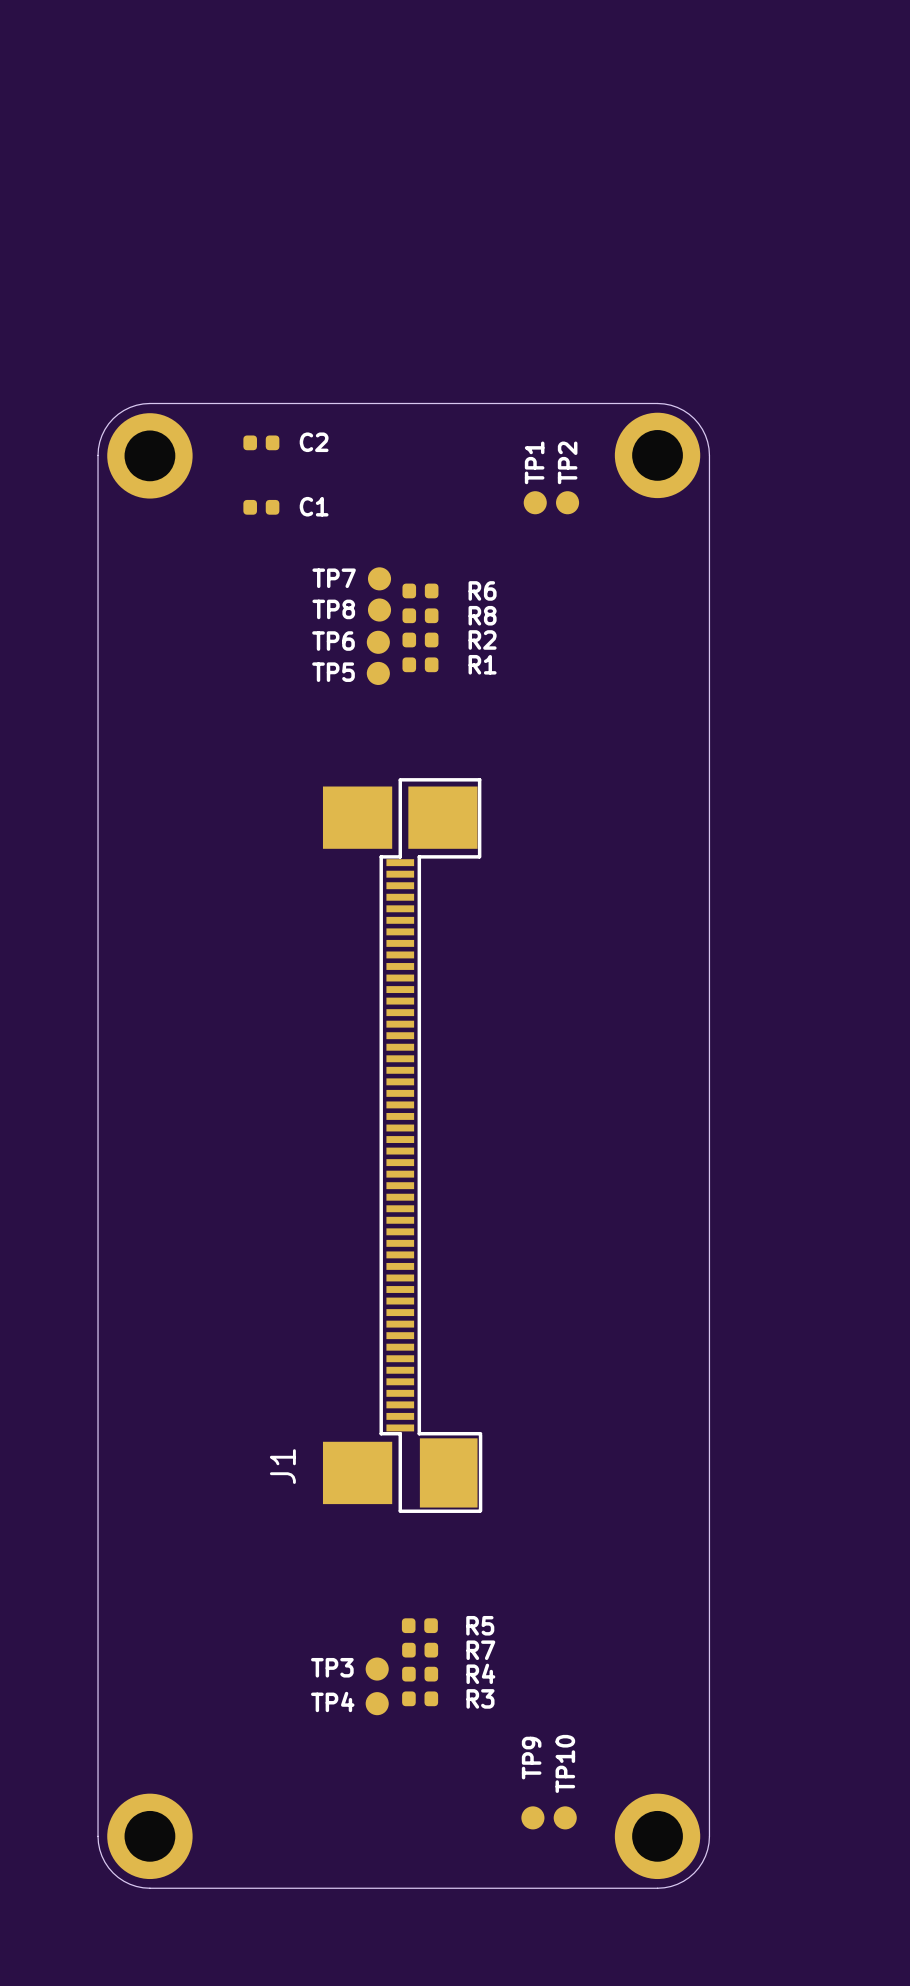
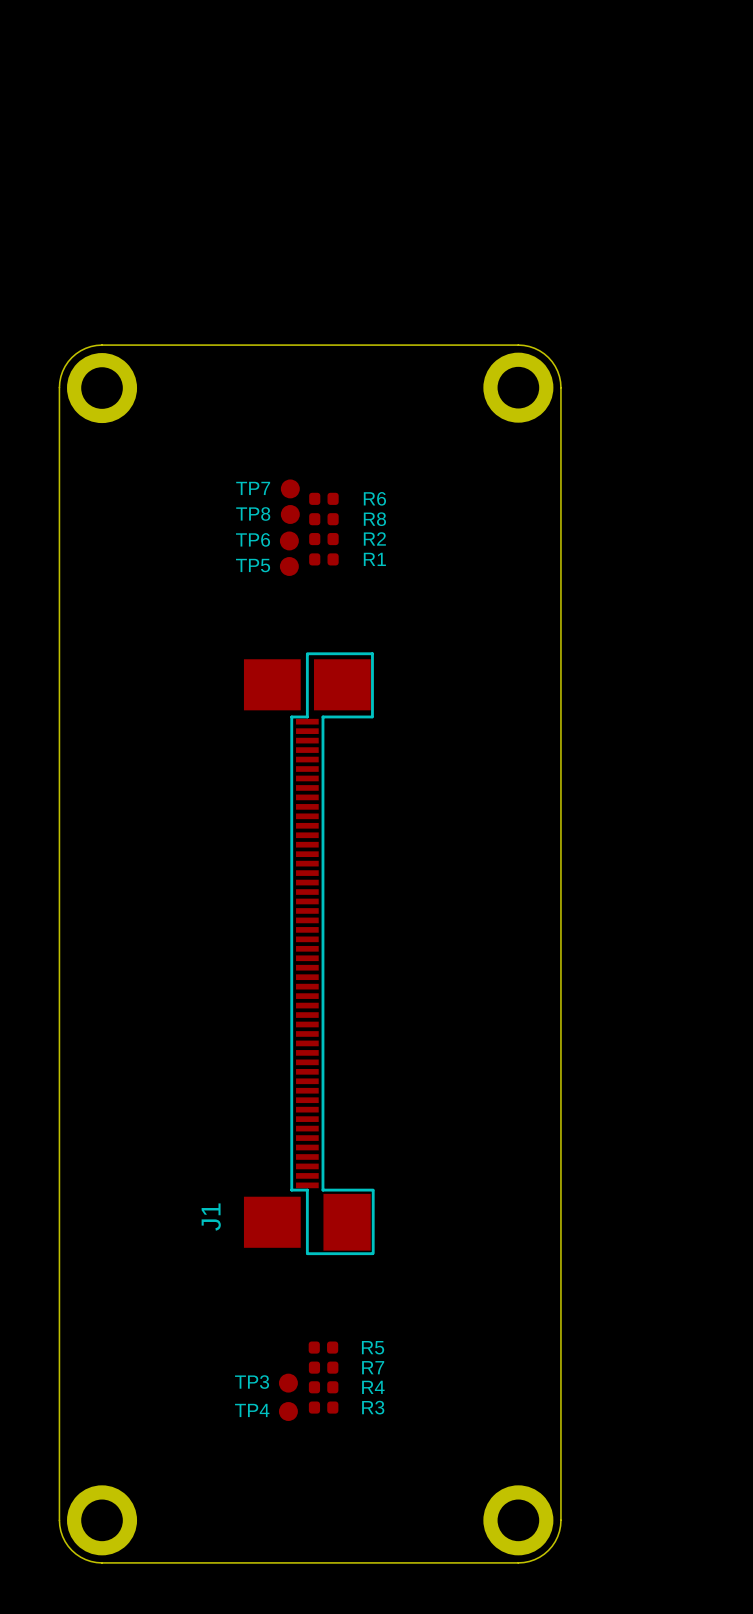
C2: (261, 442) -> none
TP1: (535, 502) -> none
TP2: (567, 502) -> none
C1: (261, 507) -> none
TP9: (532, 1817) -> none
TP10: (565, 1817) -> none

